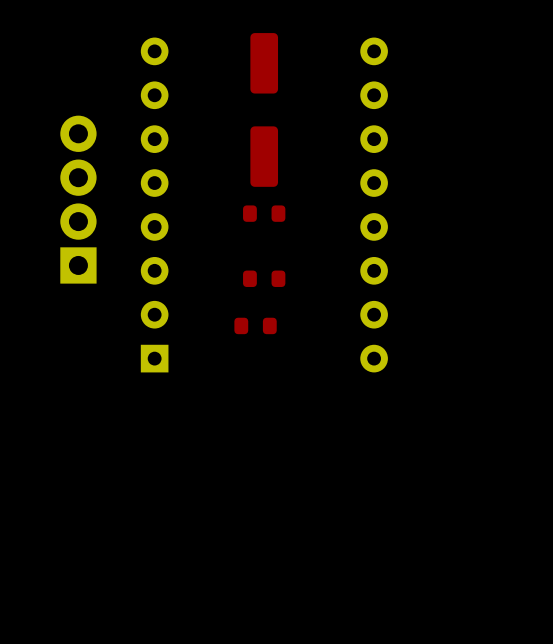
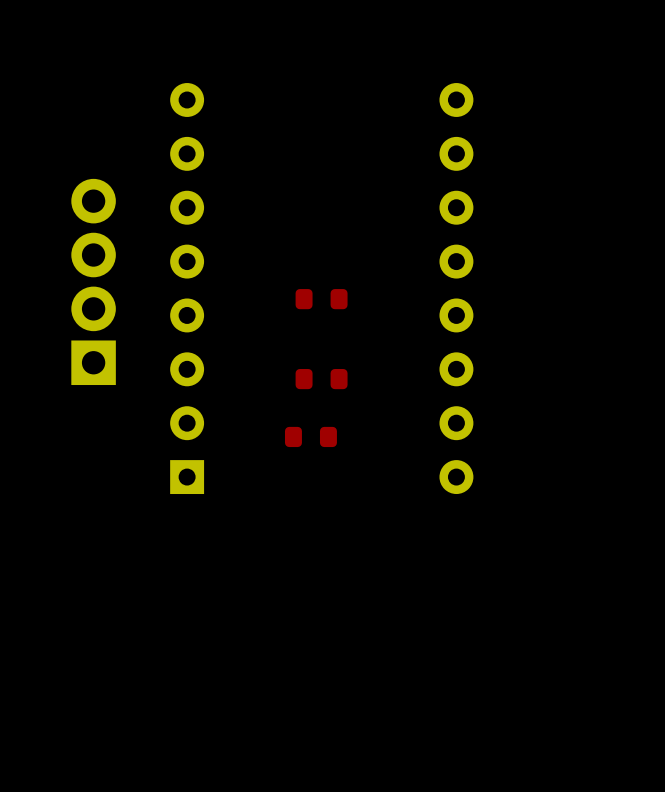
part: (264, 109) -> none

